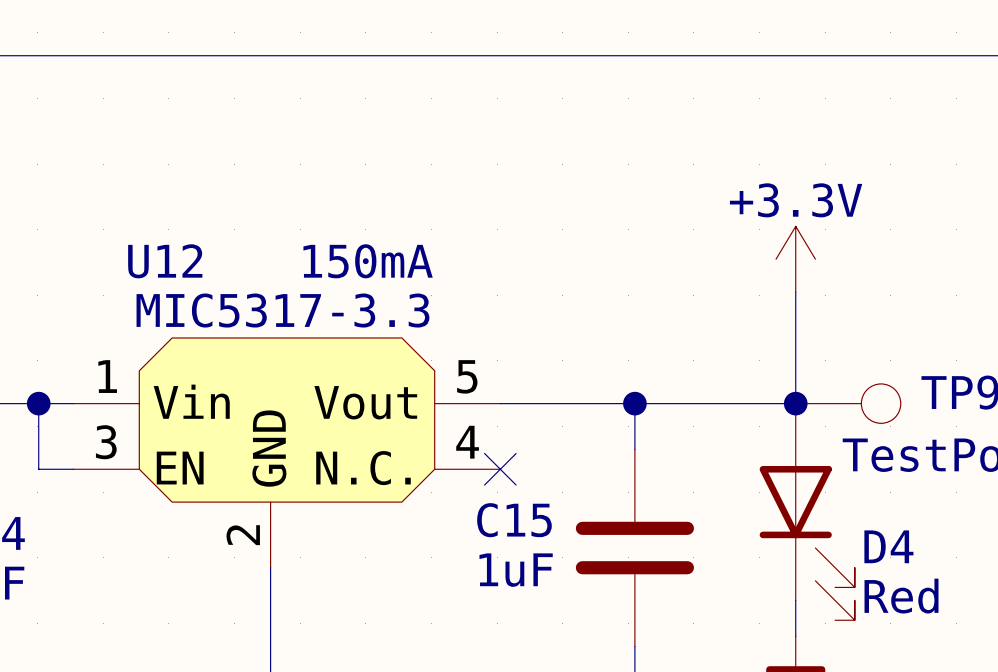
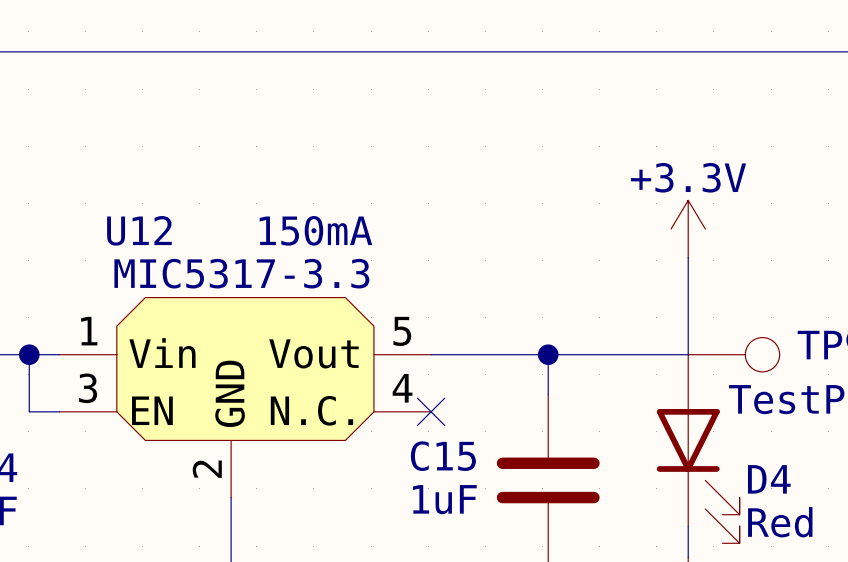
junction: (795, 403) -> none

